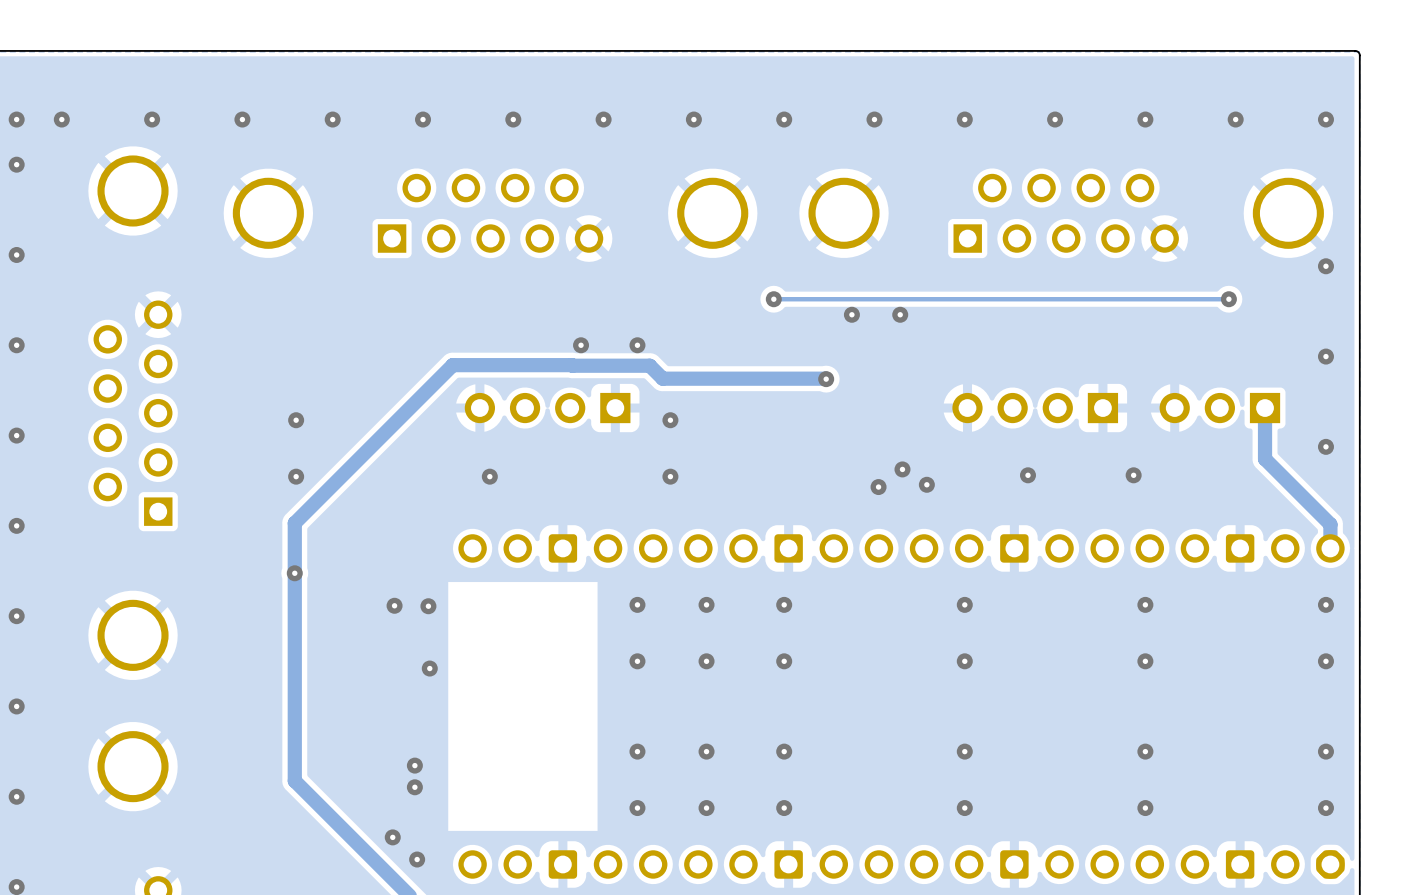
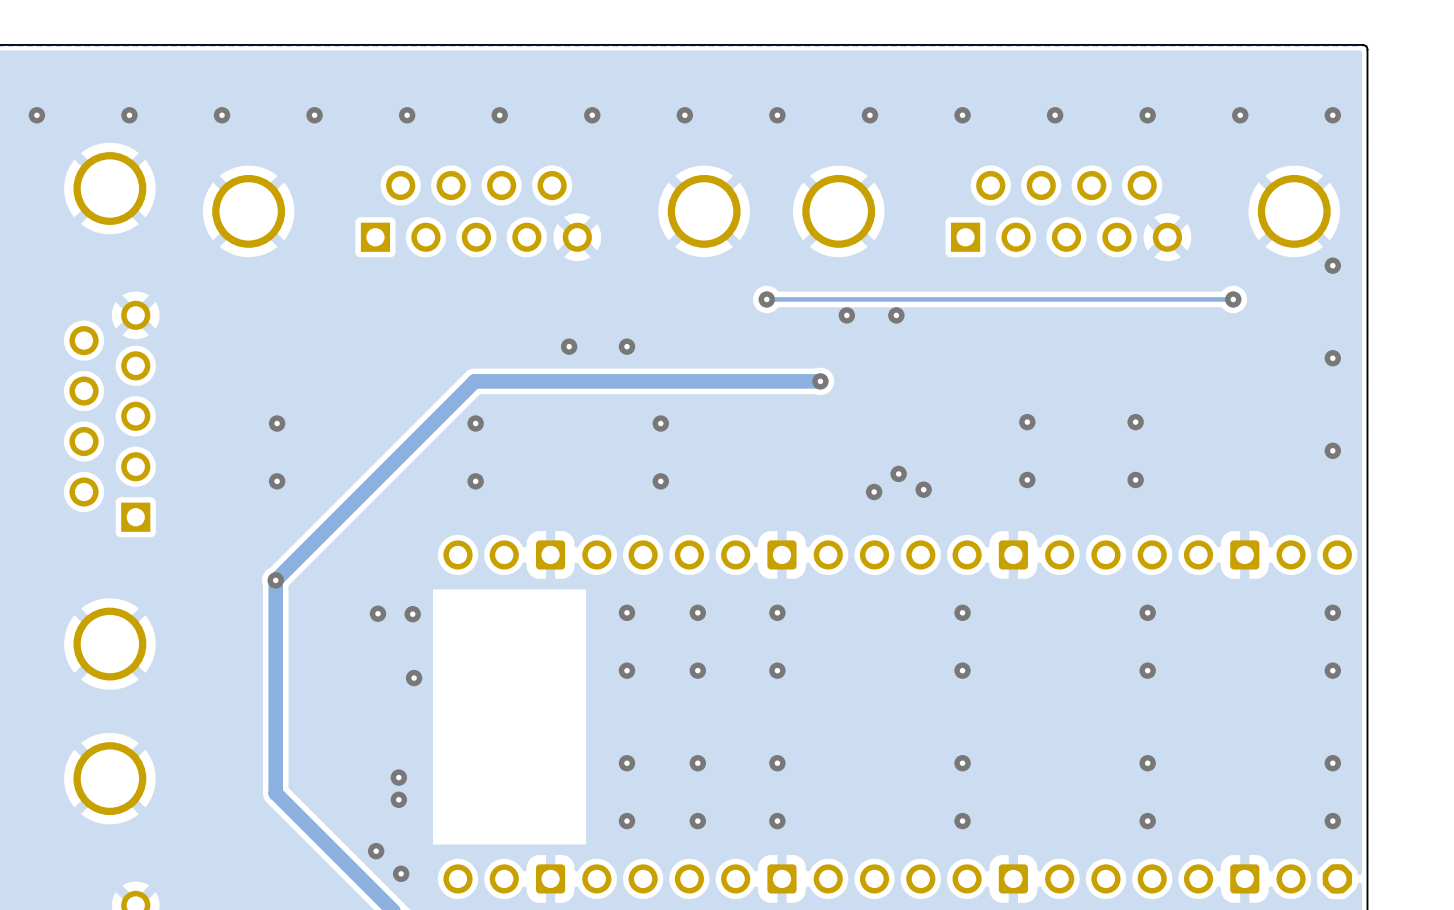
track: (826, 379) (662, 378) (649, 365) (452, 365) (294, 523) (294, 573) -> (820, 381) (474, 381) (275, 580)
part: (547, 408) -> none
part: (1035, 408) -> none
part: (1219, 408) -> none
track: (1265, 408) (1265, 459) (1330, 524) (1330, 548) -> none
via: none -> (1027, 422)
via: none -> (1135, 422)
via: none -> (475, 423)

